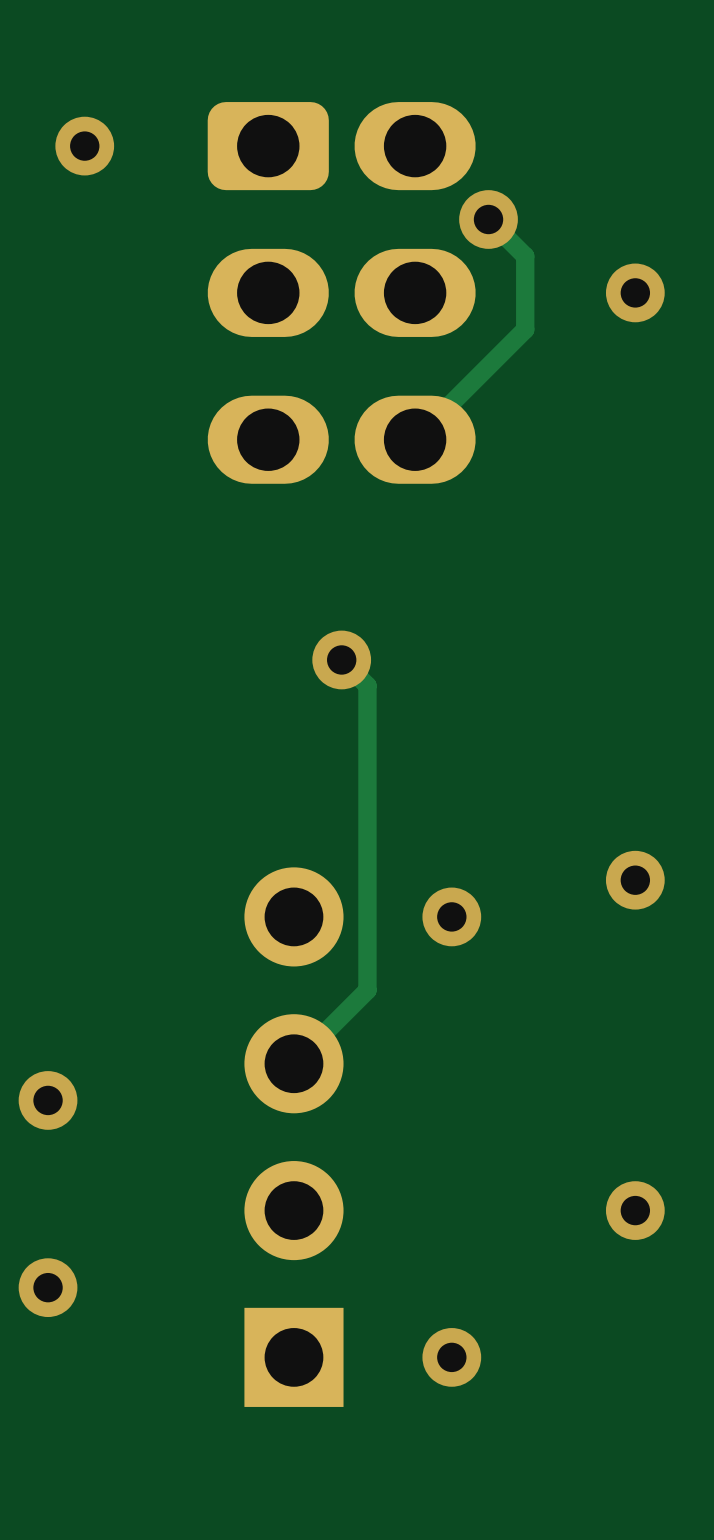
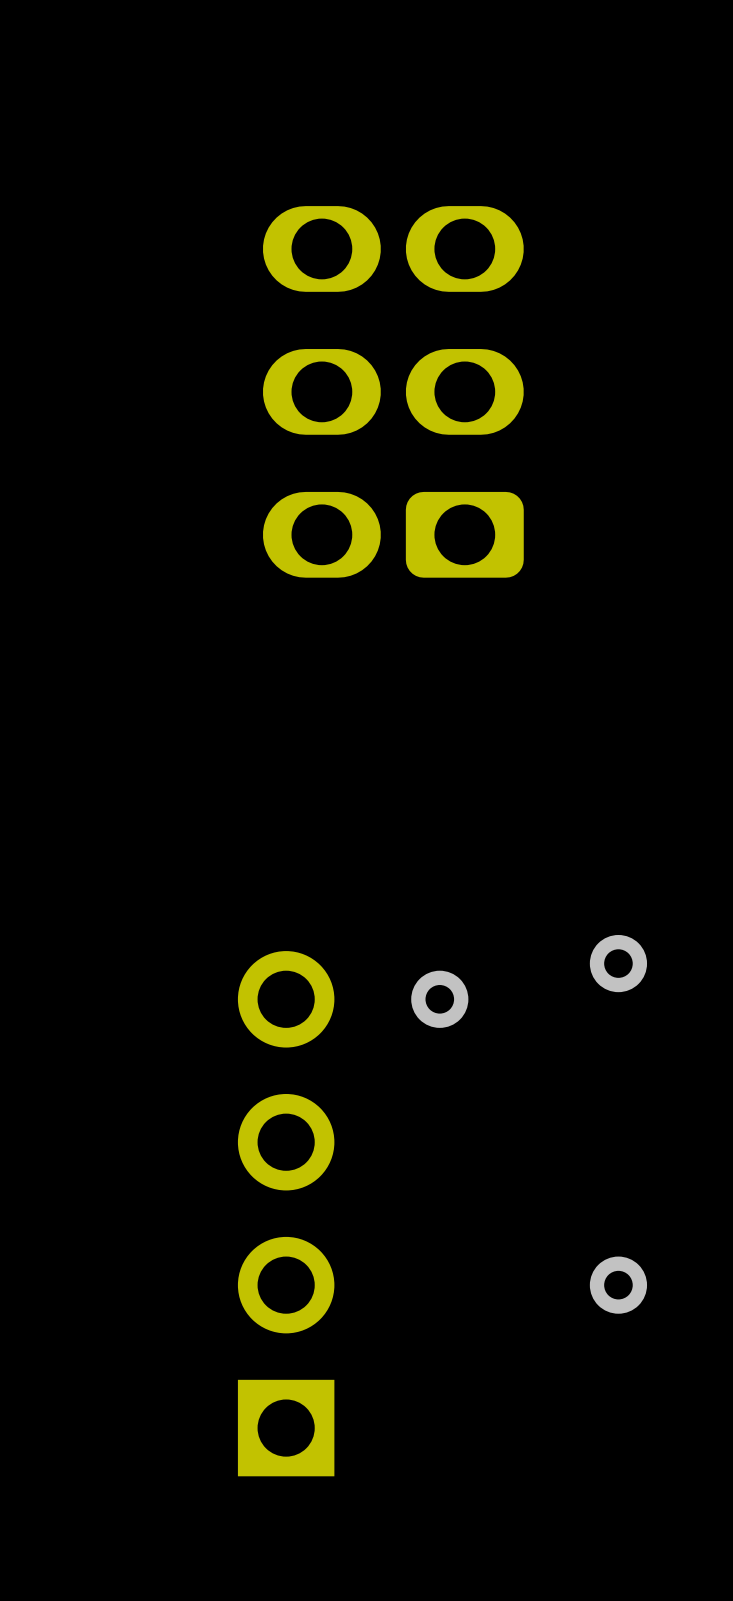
via: (84, 146) -> none
track: (488, 219) (525, 256) (525, 329) (415, 439) -> none
via: (488, 219) -> none
part rotation: 0° (341, 292) -> 180° (393, 391)
via: (635, 292) -> none
track: (341, 659) (367, 685) (367, 990) (293, 1063) -> none
via: (341, 659) -> none
via: (48, 1100) -> none
via: (48, 1287) -> none
via: (451, 1357) -> none

